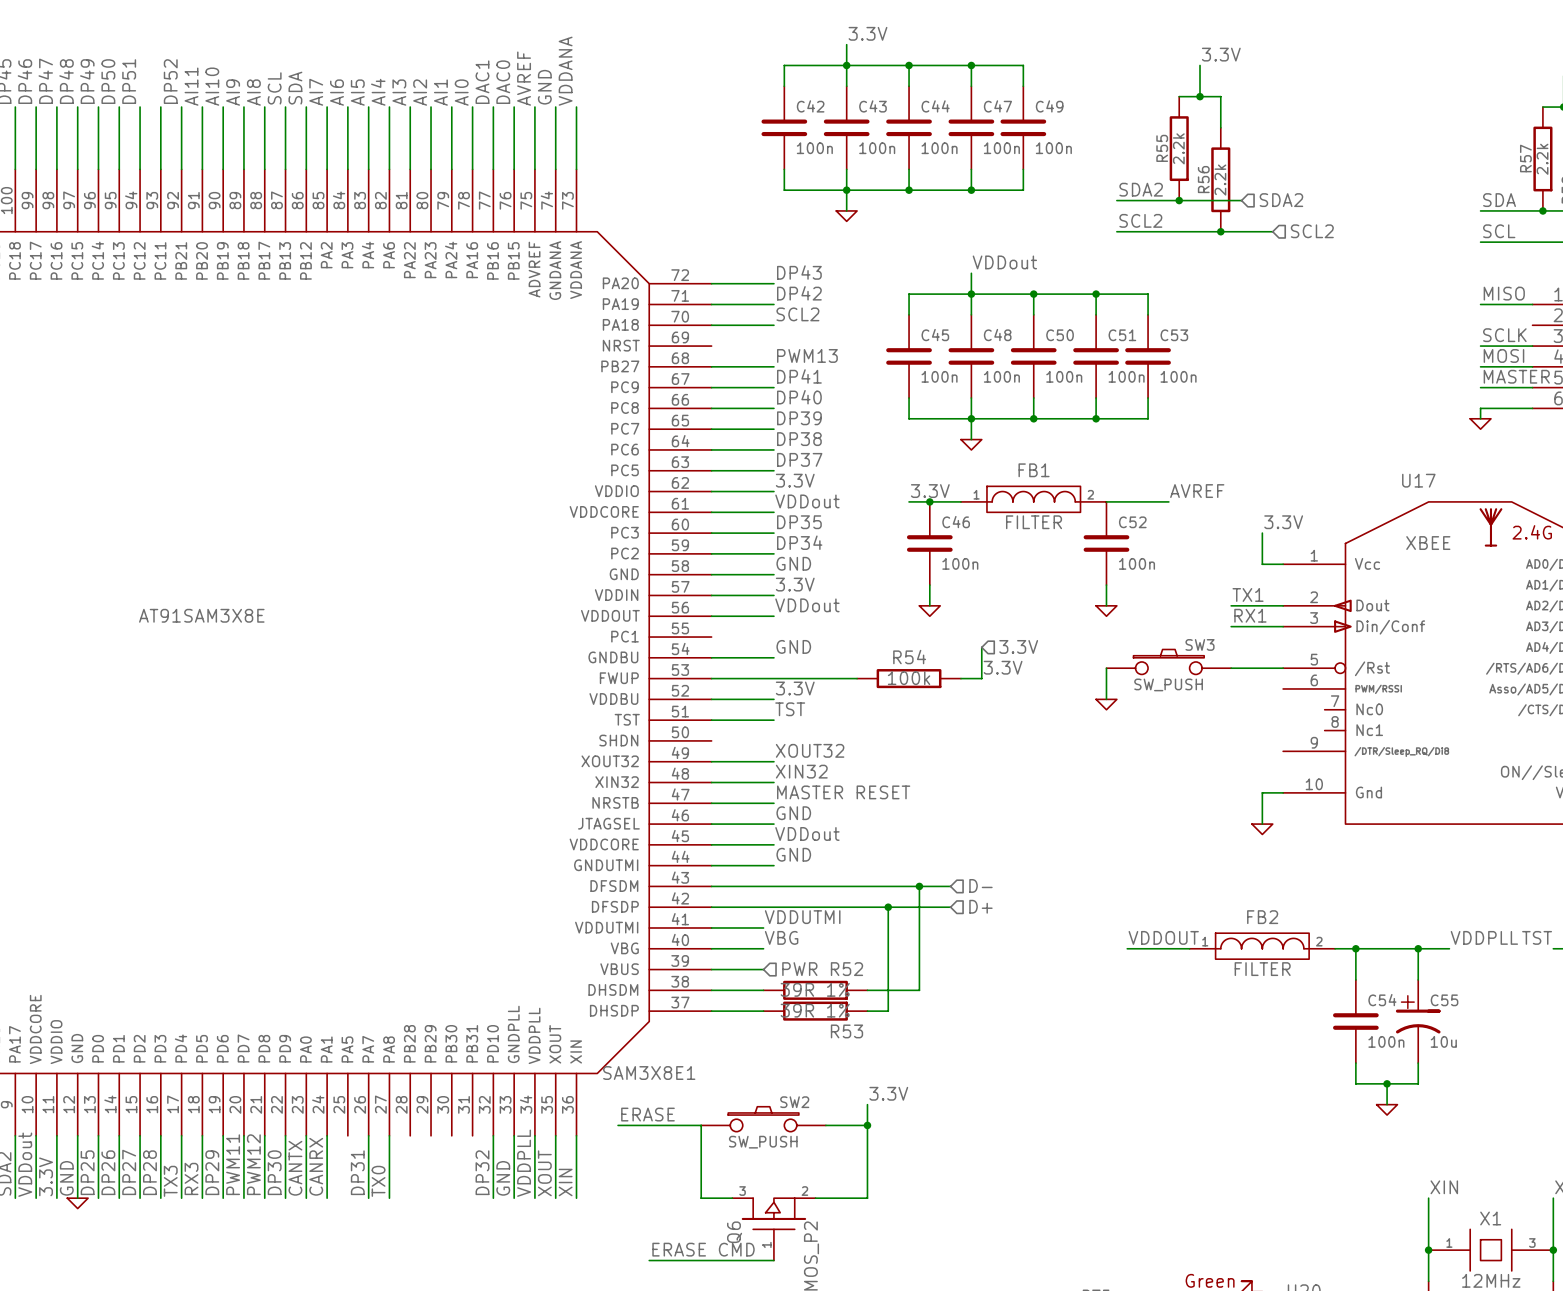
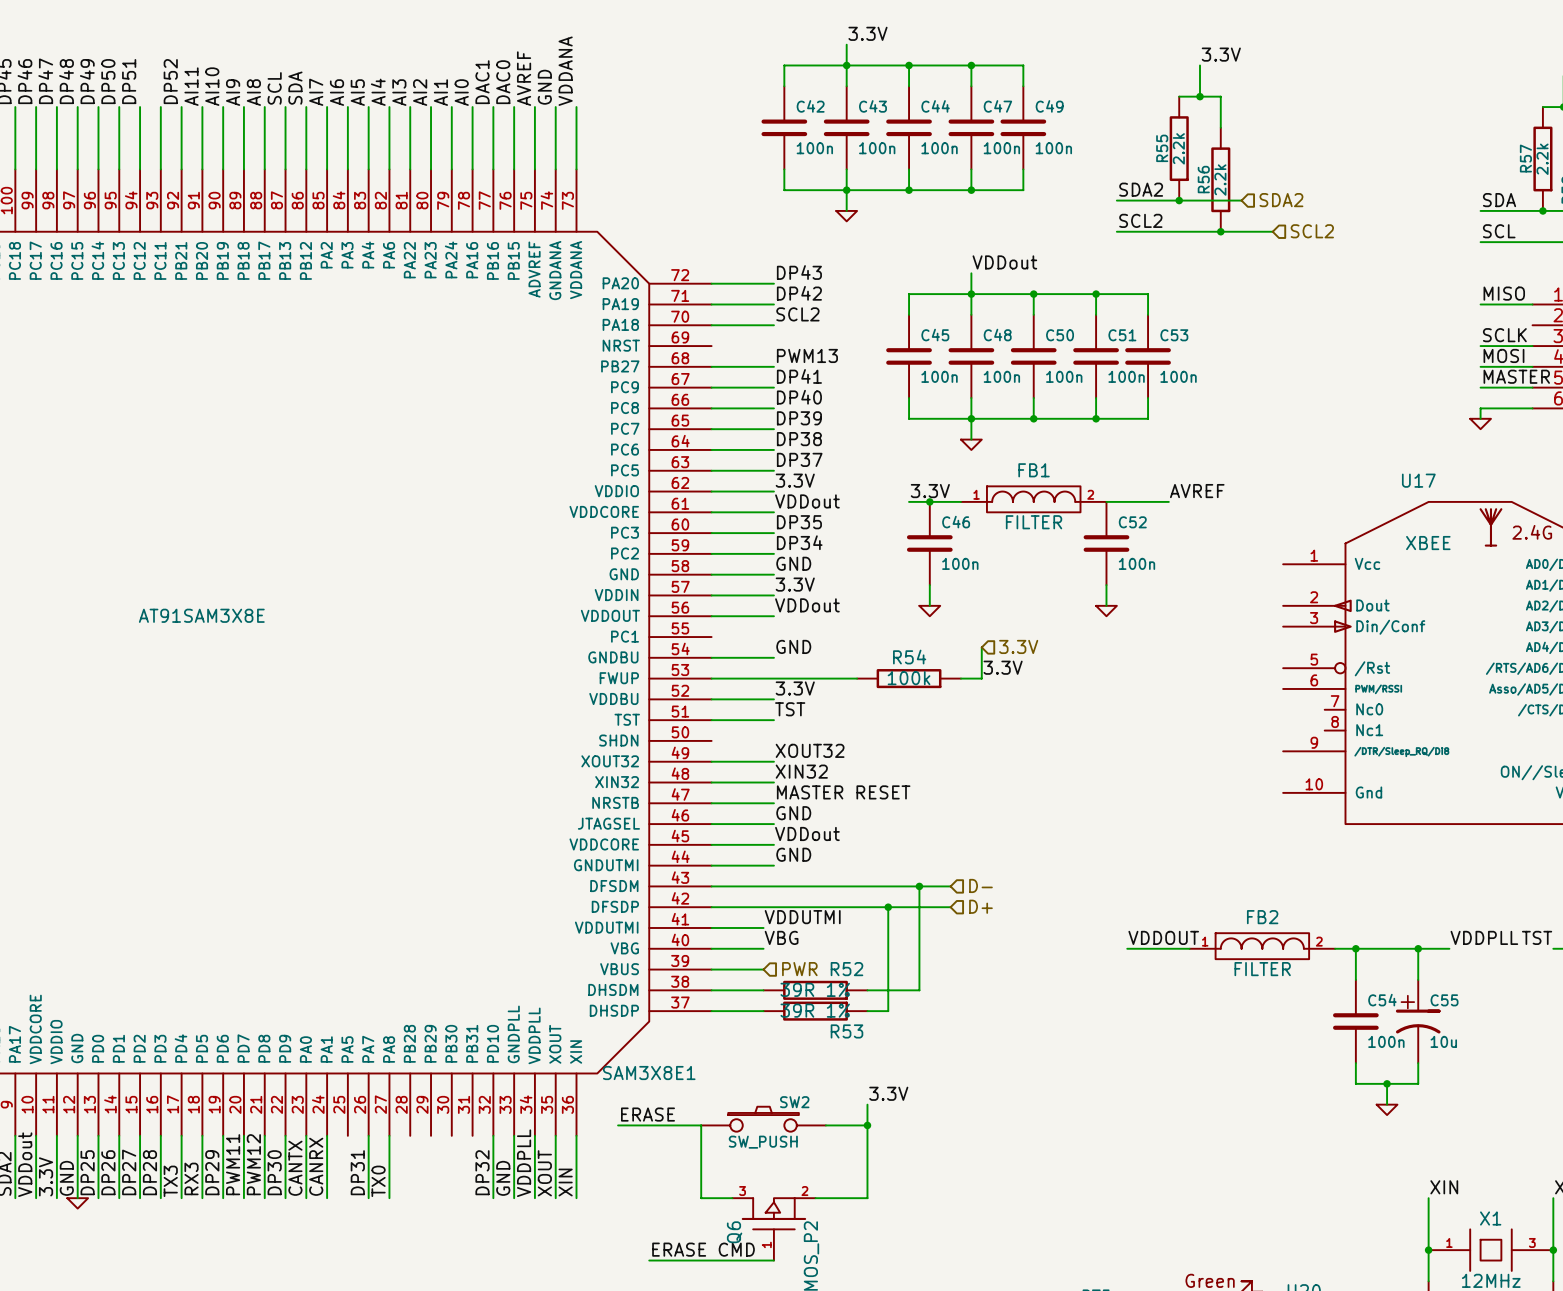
label: 3.3V (1283, 522) -> none
wire: (1262, 533) (1262, 564) (1283, 564) -> none
label: TX1 (1248, 594) -> none
wire: (1231, 605) (1283, 605) -> none
label: RX1 (1250, 615) -> none
wire: (1231, 626) (1283, 626) -> none
SW3: SW_PUSH (1168, 661) -> none
wire: (1106, 668) (1106, 699) -> none
wire: (1231, 668) (1283, 668) -> none
power symbol: (1106, 704) -> none
wire: (1283, 792) (1262, 792) (1262, 824) -> none
power symbol: (1262, 829) -> none

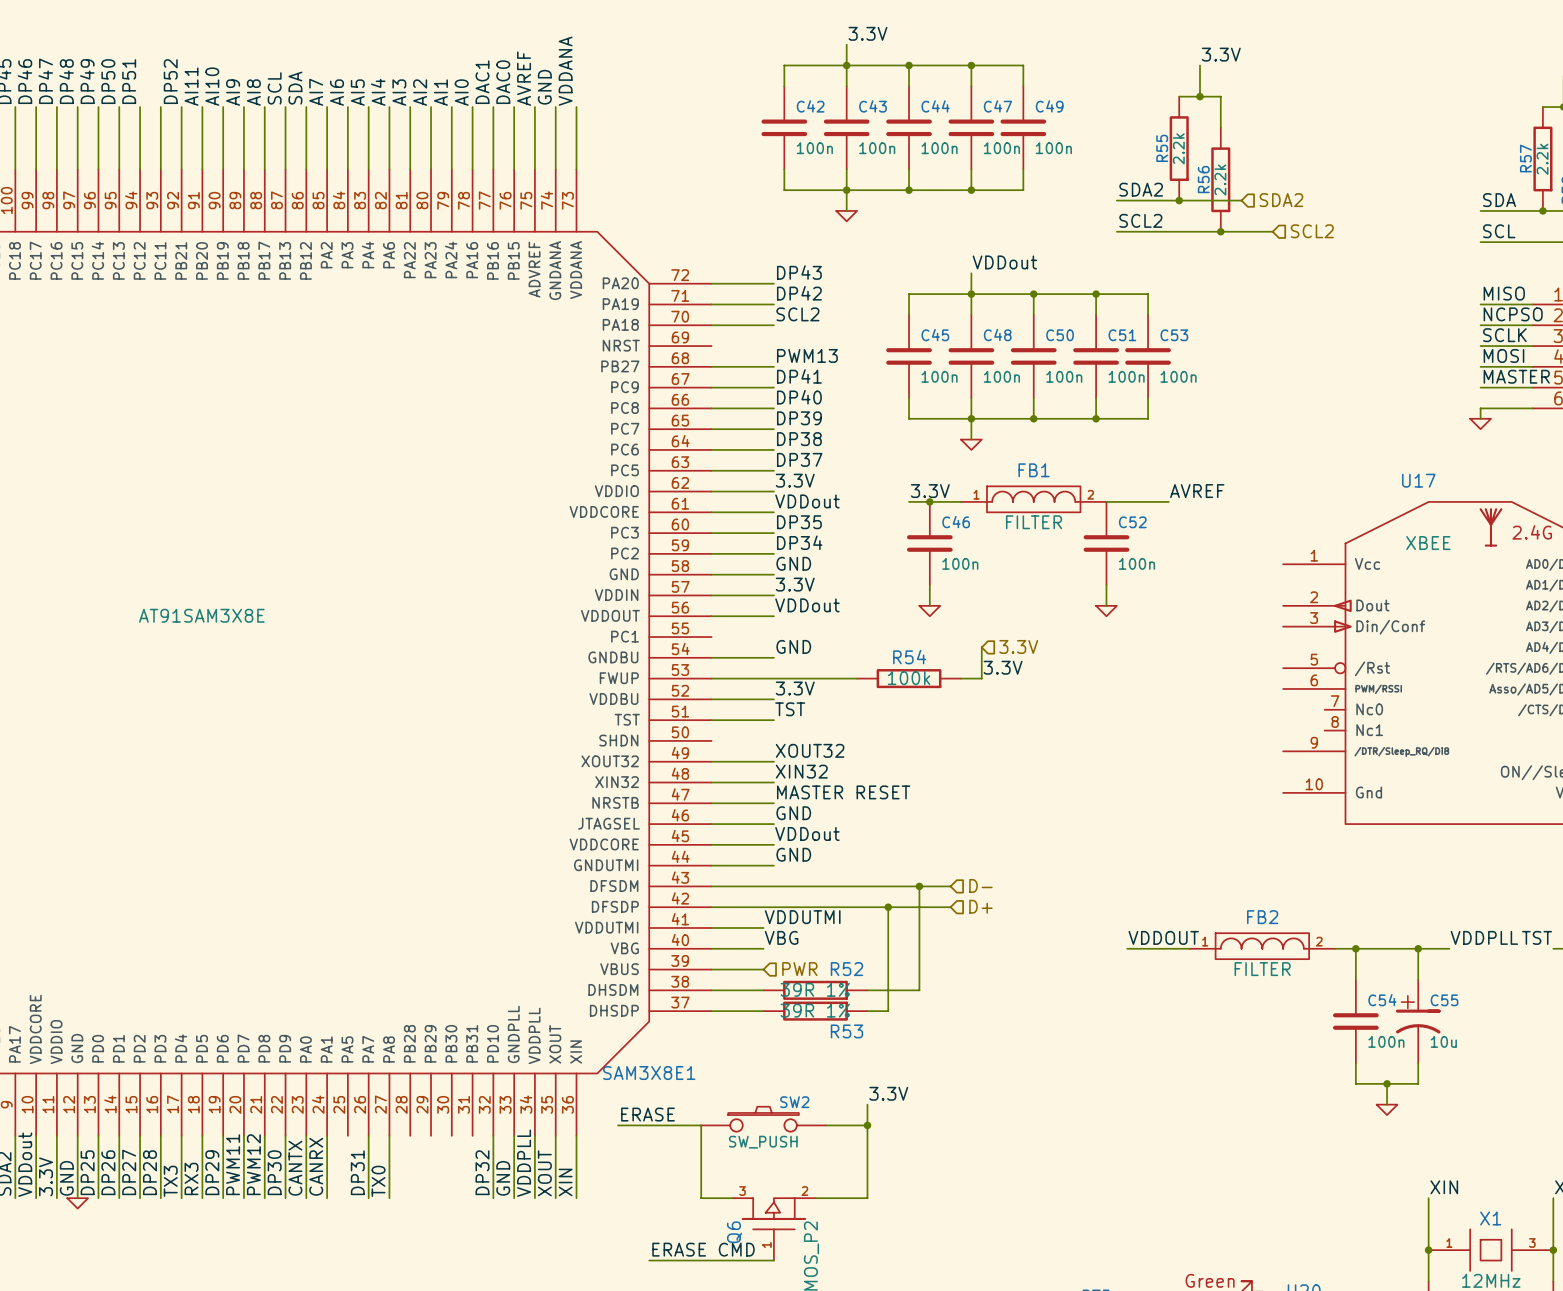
label: none -> NCPSO (1513, 314)
wire: none -> (1480, 325) (1532, 325)

